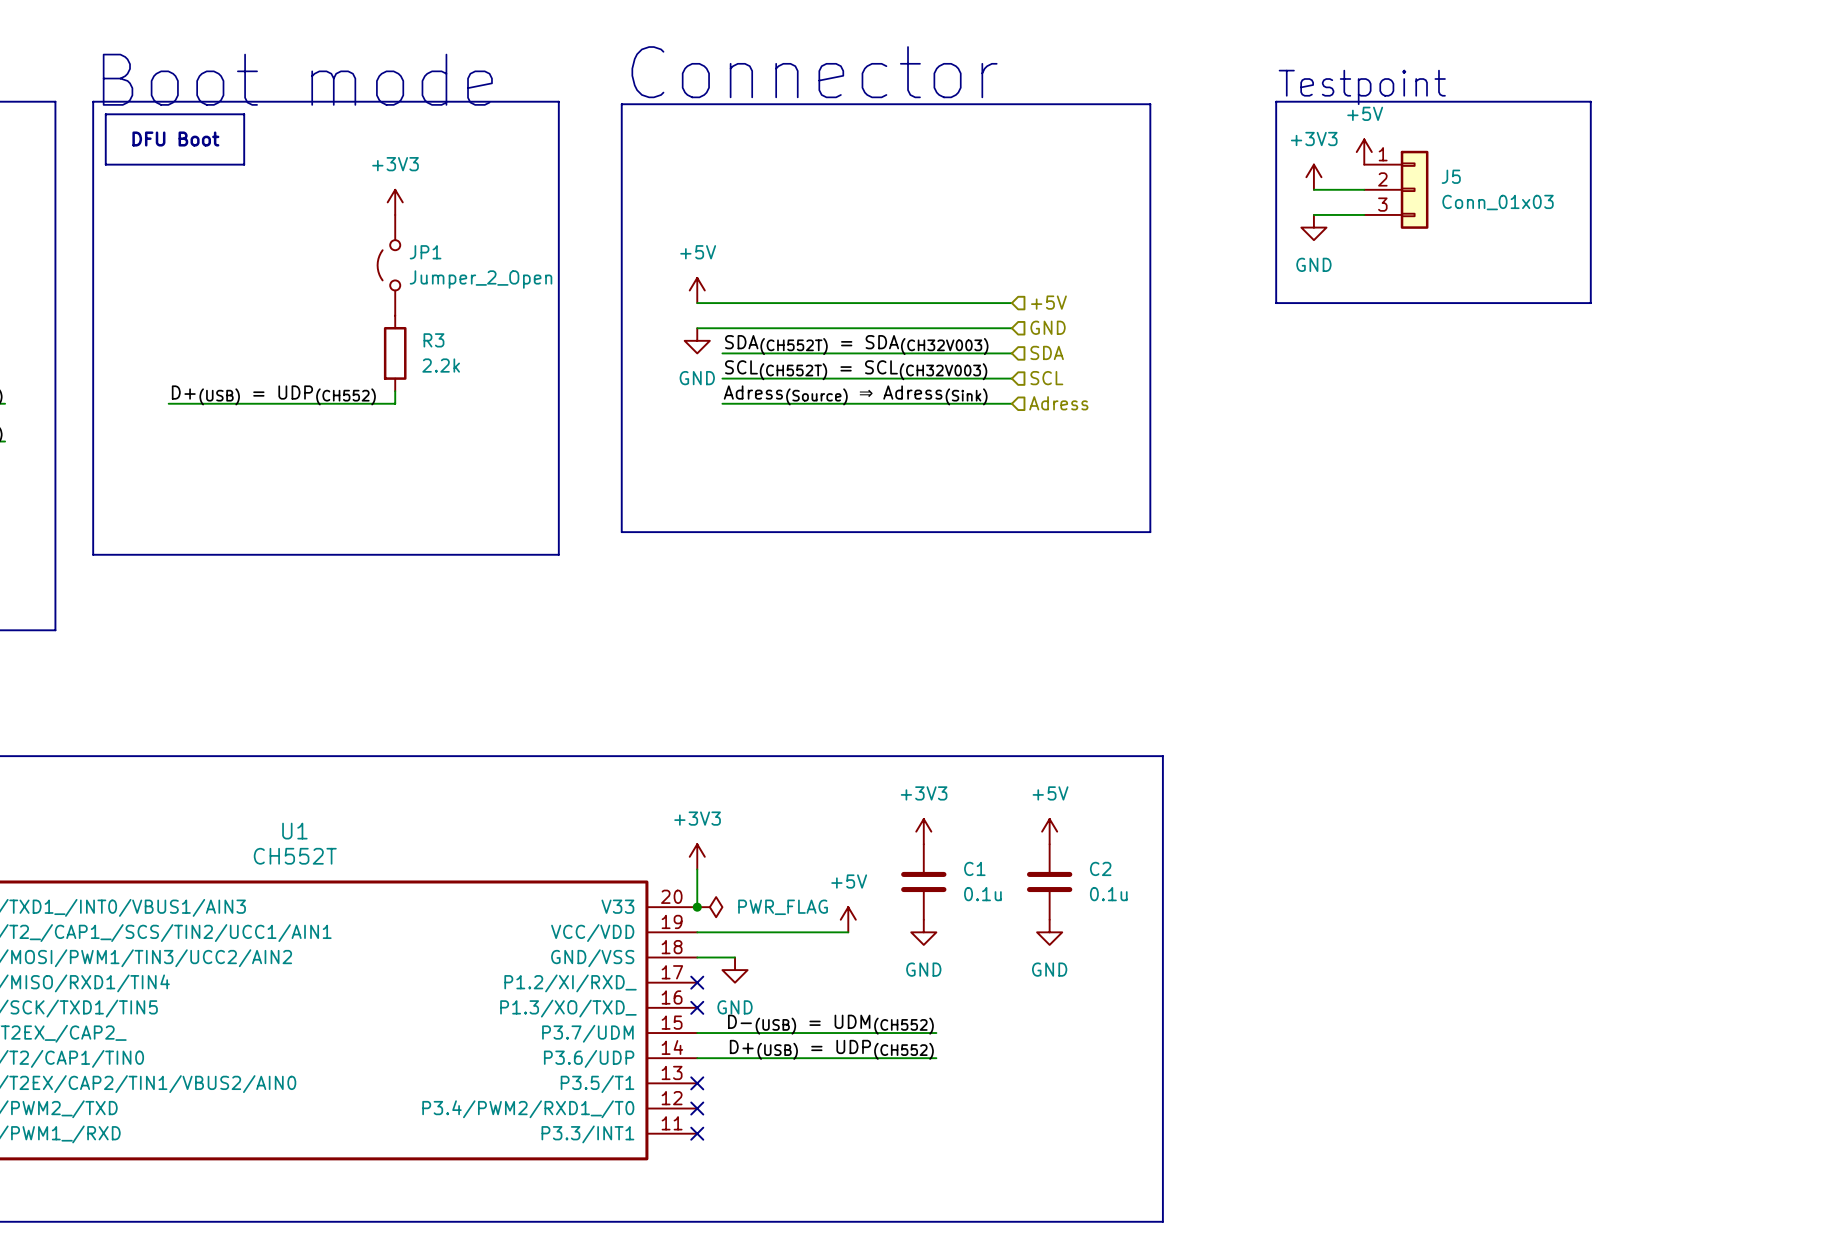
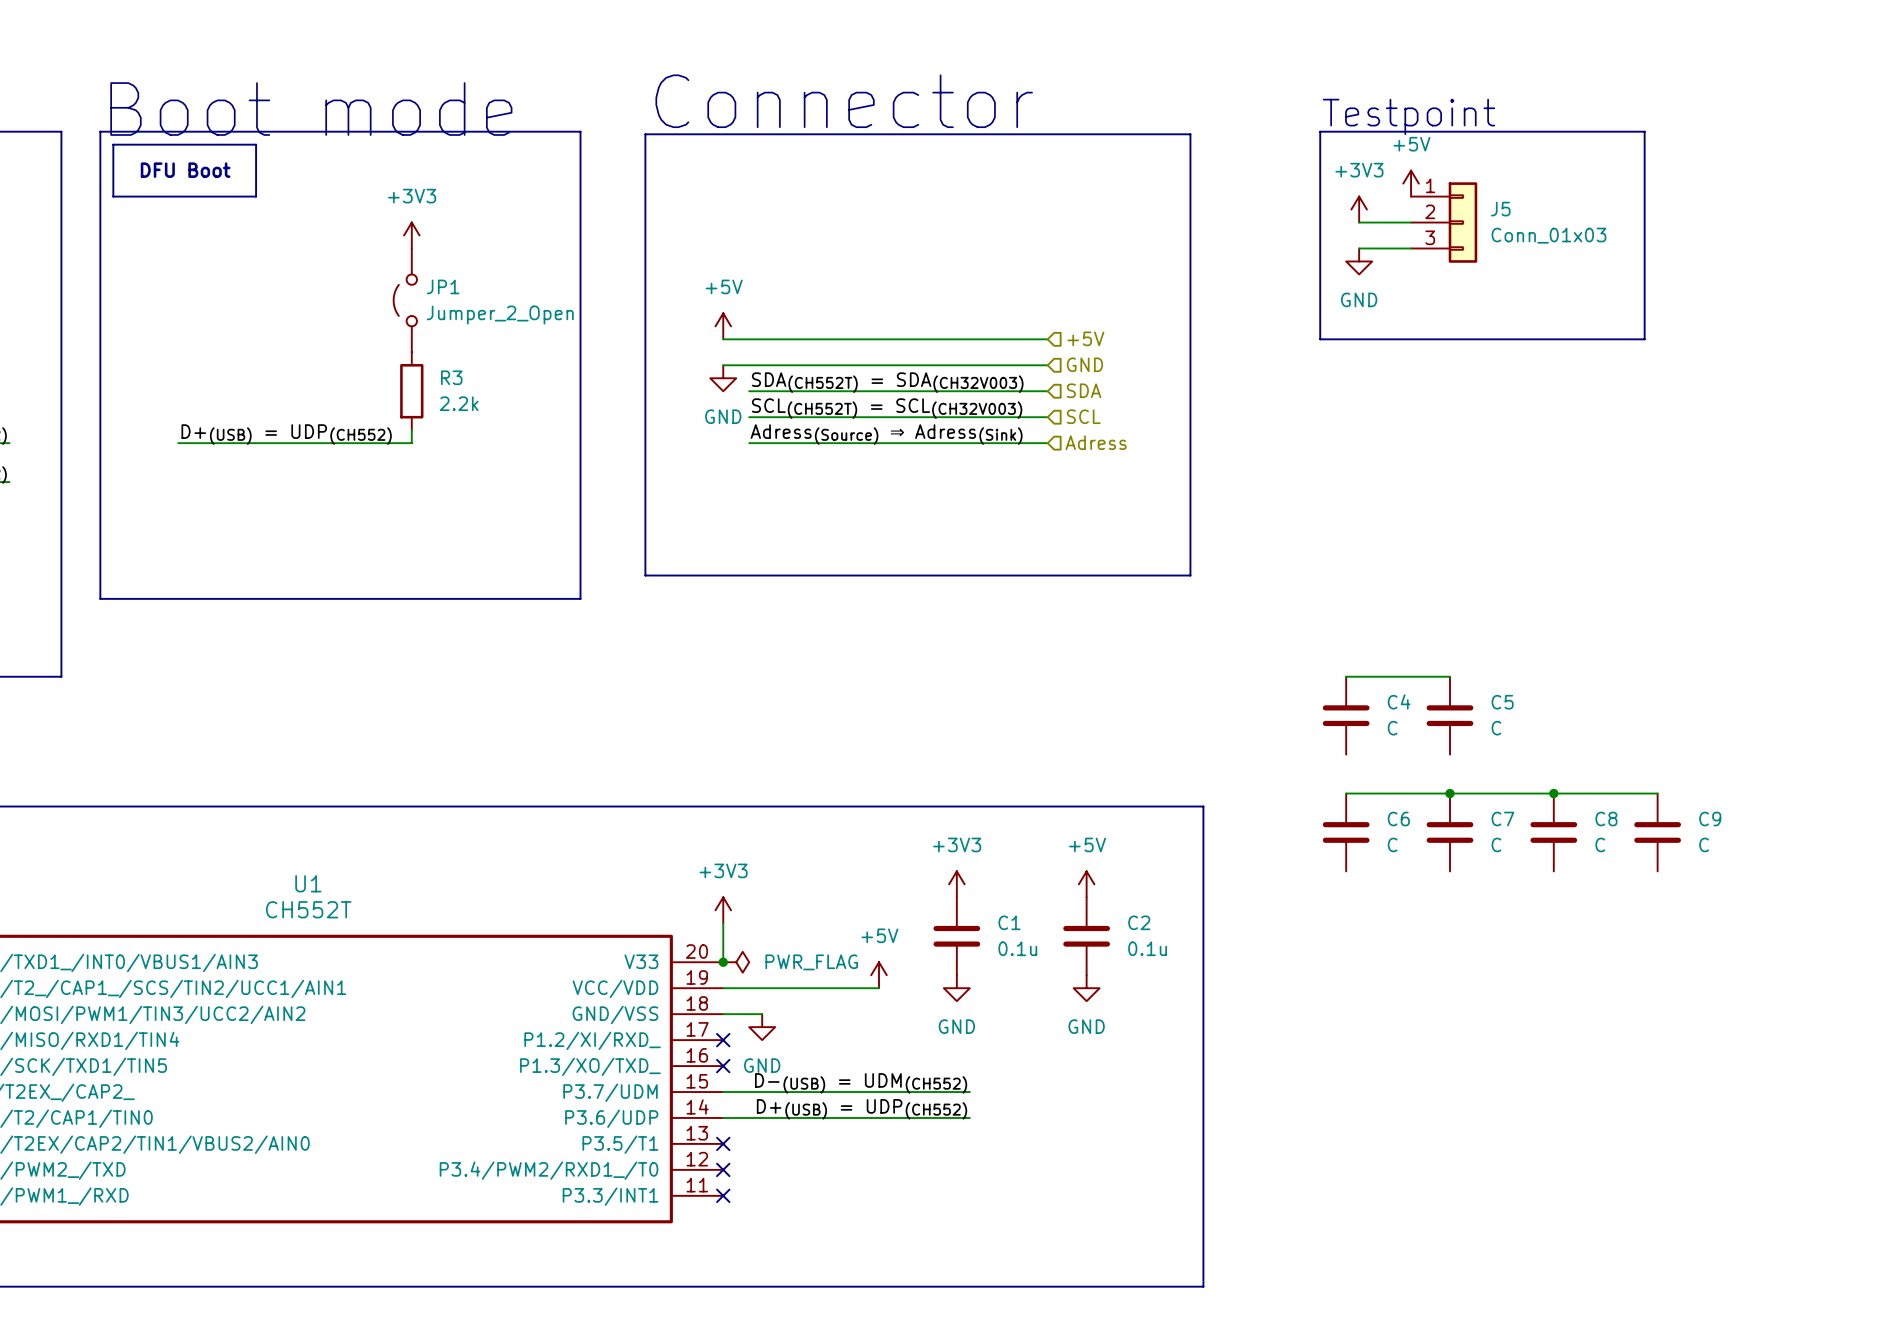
wire: none -> (1346, 676) (1449, 676)
C4: none -> C (1346, 715)
C5: none -> C (1449, 715)
wire: none -> (1346, 793) (1657, 793)
junction: none -> (1449, 793)
junction: none -> (1553, 793)
C6: none -> C (1346, 832)
C7: none -> C (1449, 832)
C8: none -> C (1553, 832)
C9: none -> C (1657, 832)

